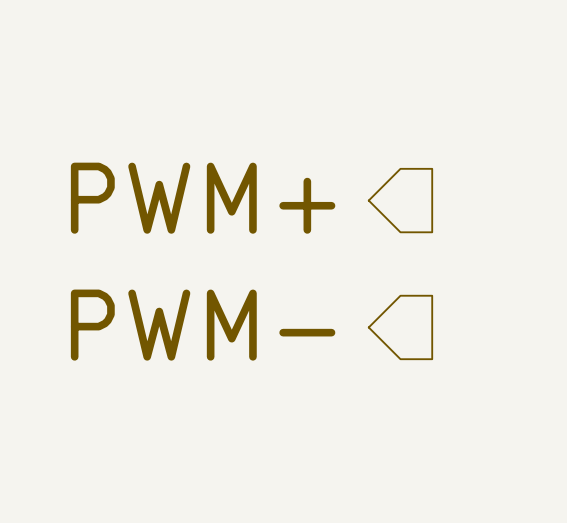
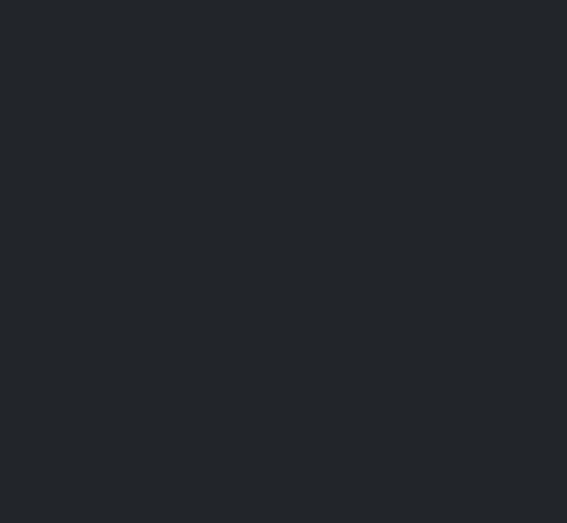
hierarchical label: PWM+ (203, 198) -> none
hierarchical label: PWM- (203, 325) -> none

